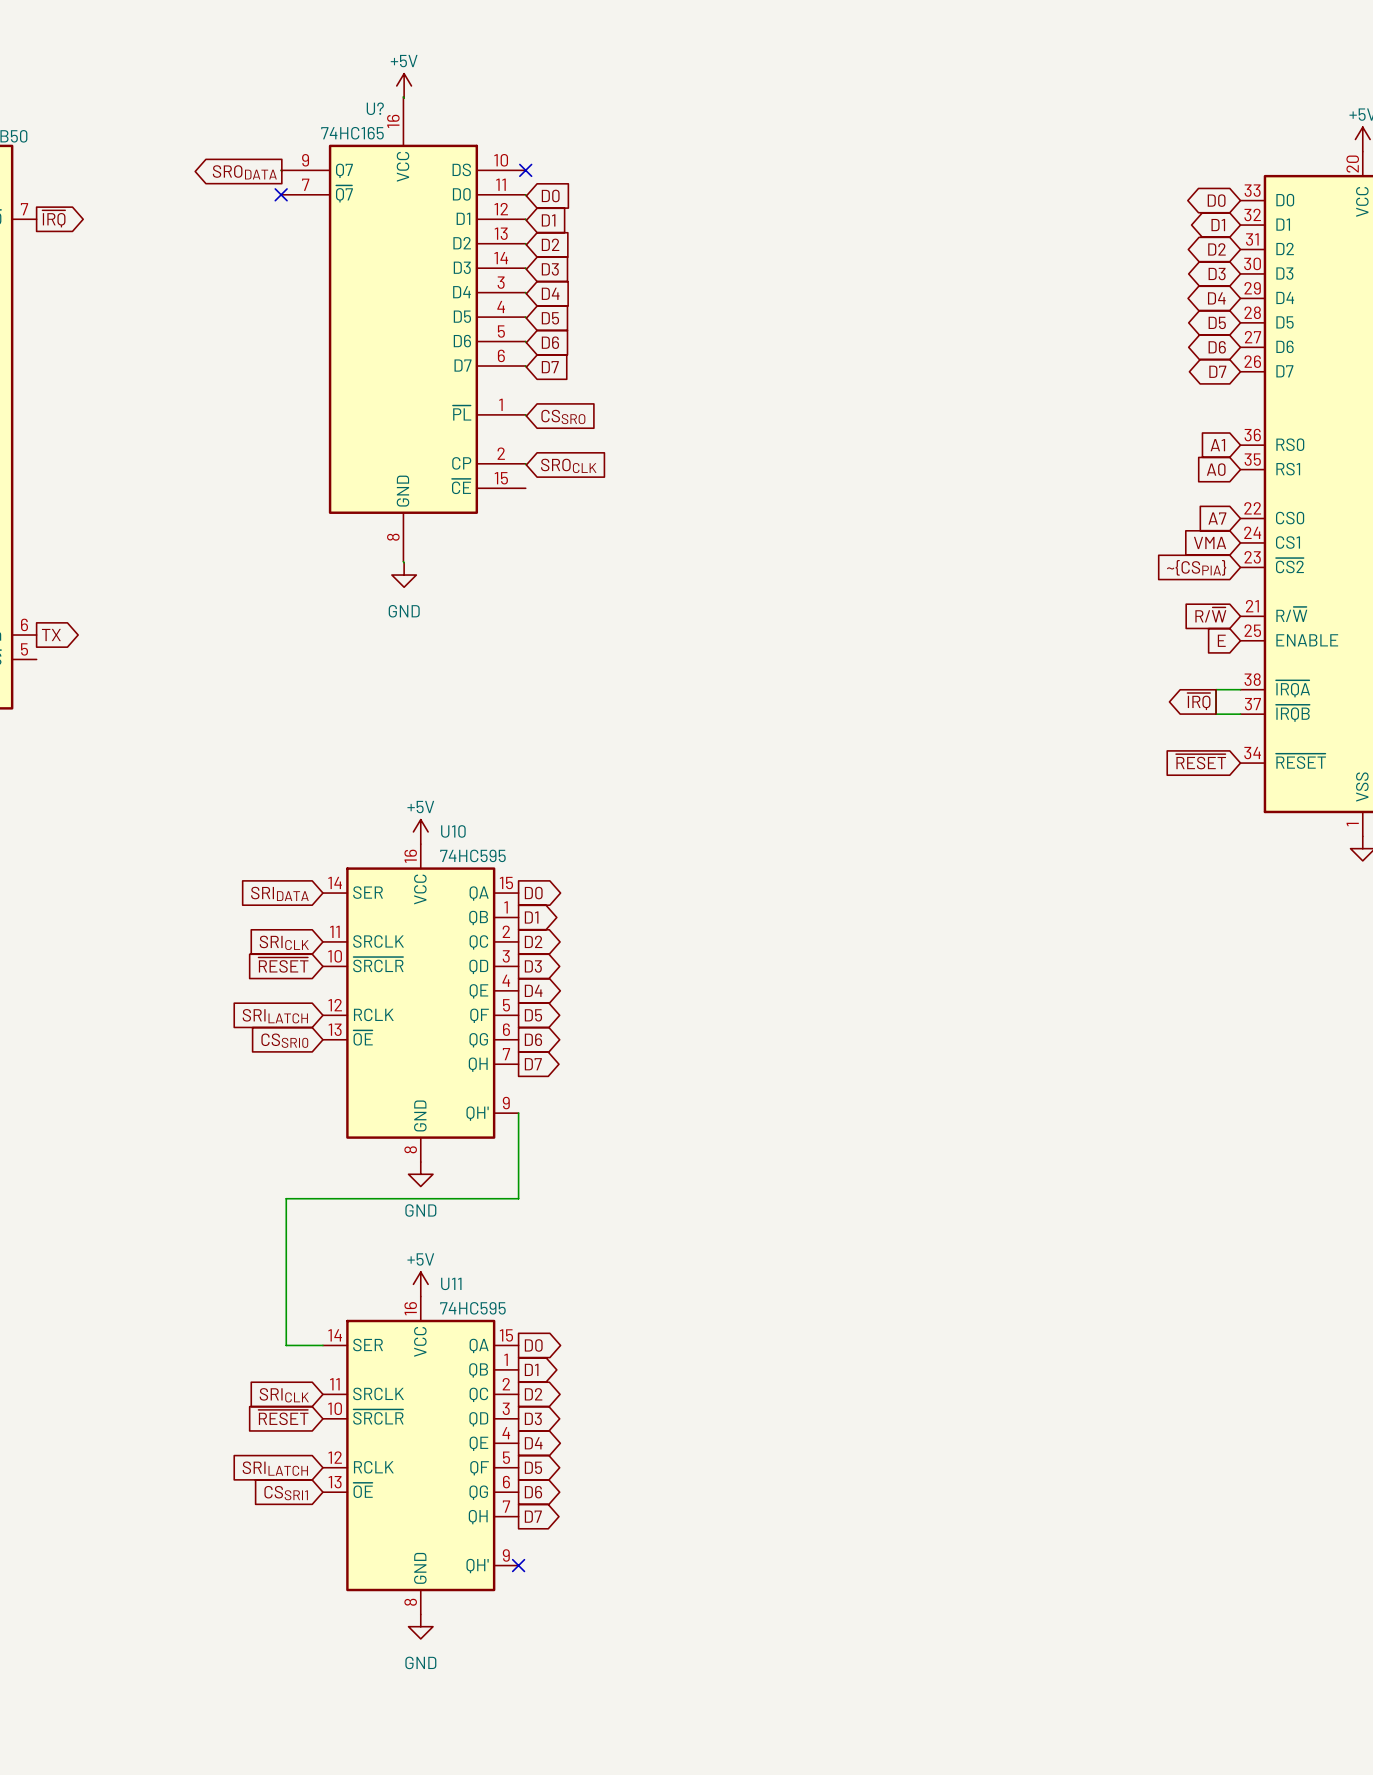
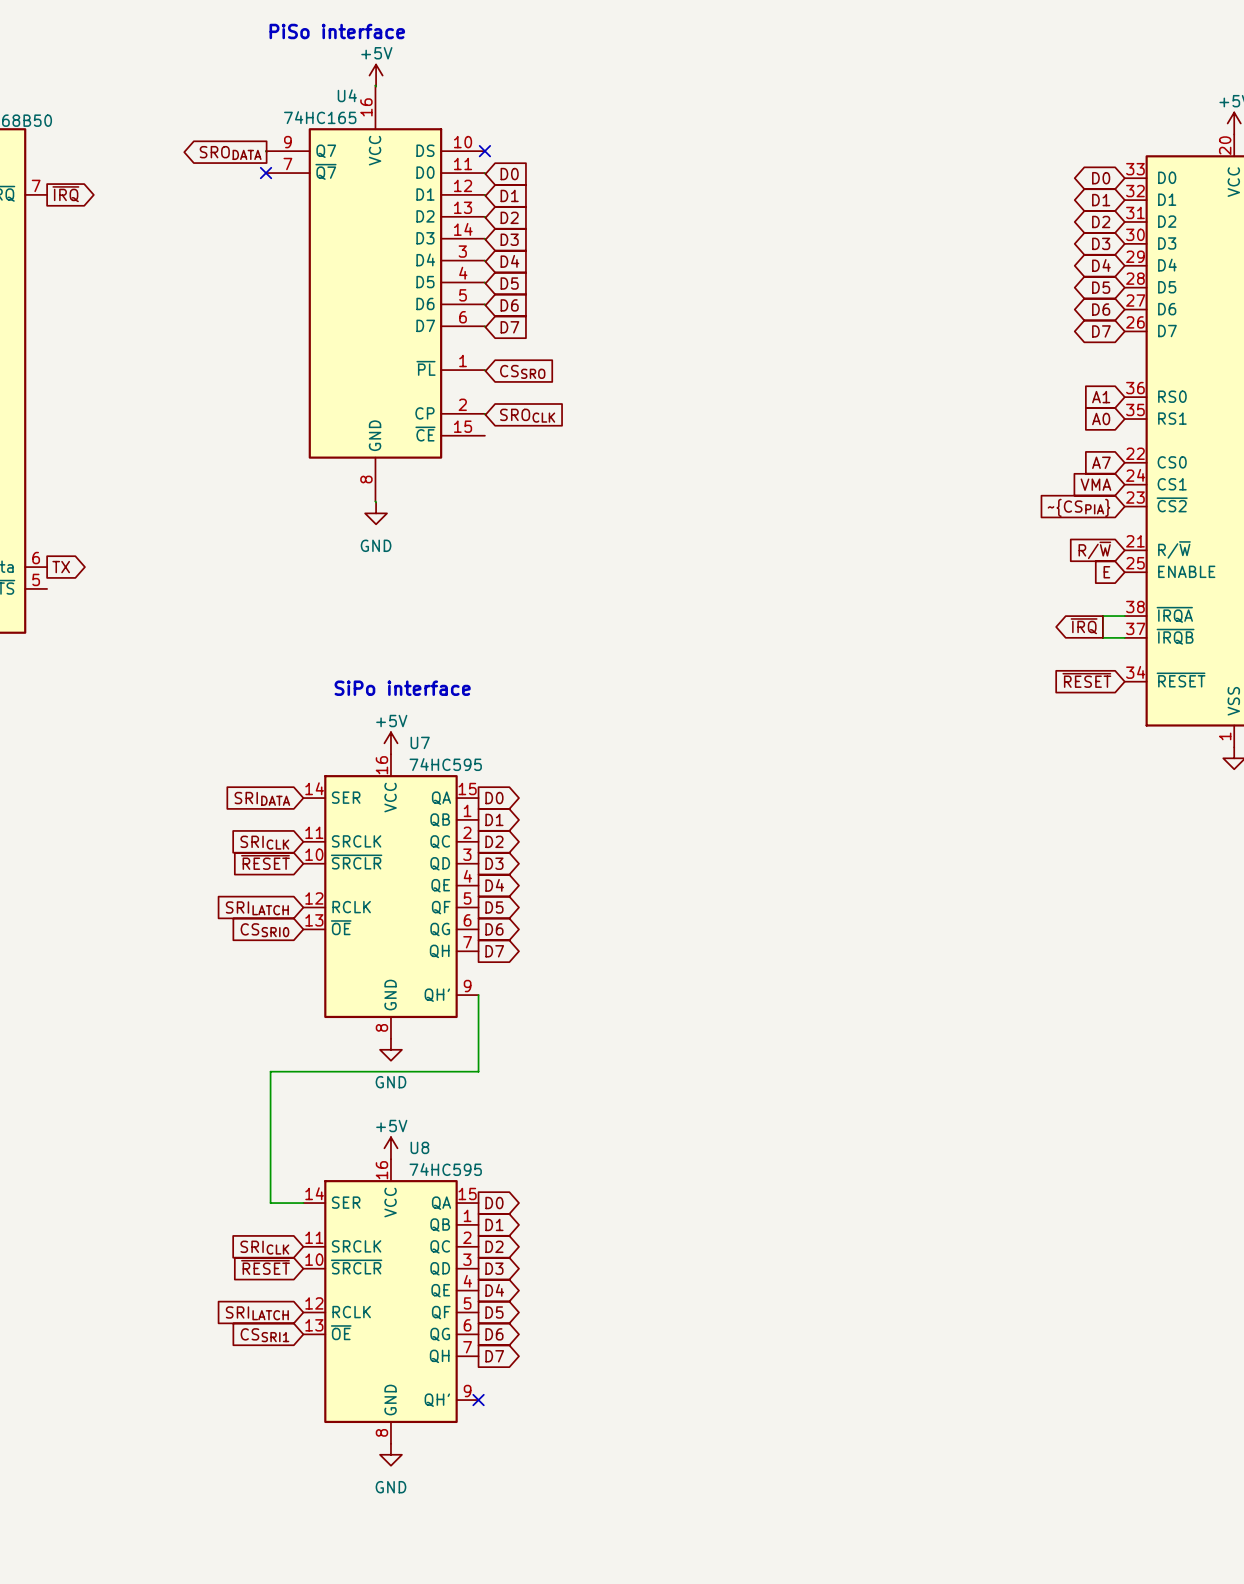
text: none -> PiSo interface (337, 31)
U? name: U? (375, 108) -> U4 (347, 95)
text: none -> SiPo interface (402, 688)
U10 name: U10 (453, 831) -> U7 (420, 742)
U11 name: U11 (451, 1283) -> U8 (419, 1147)

